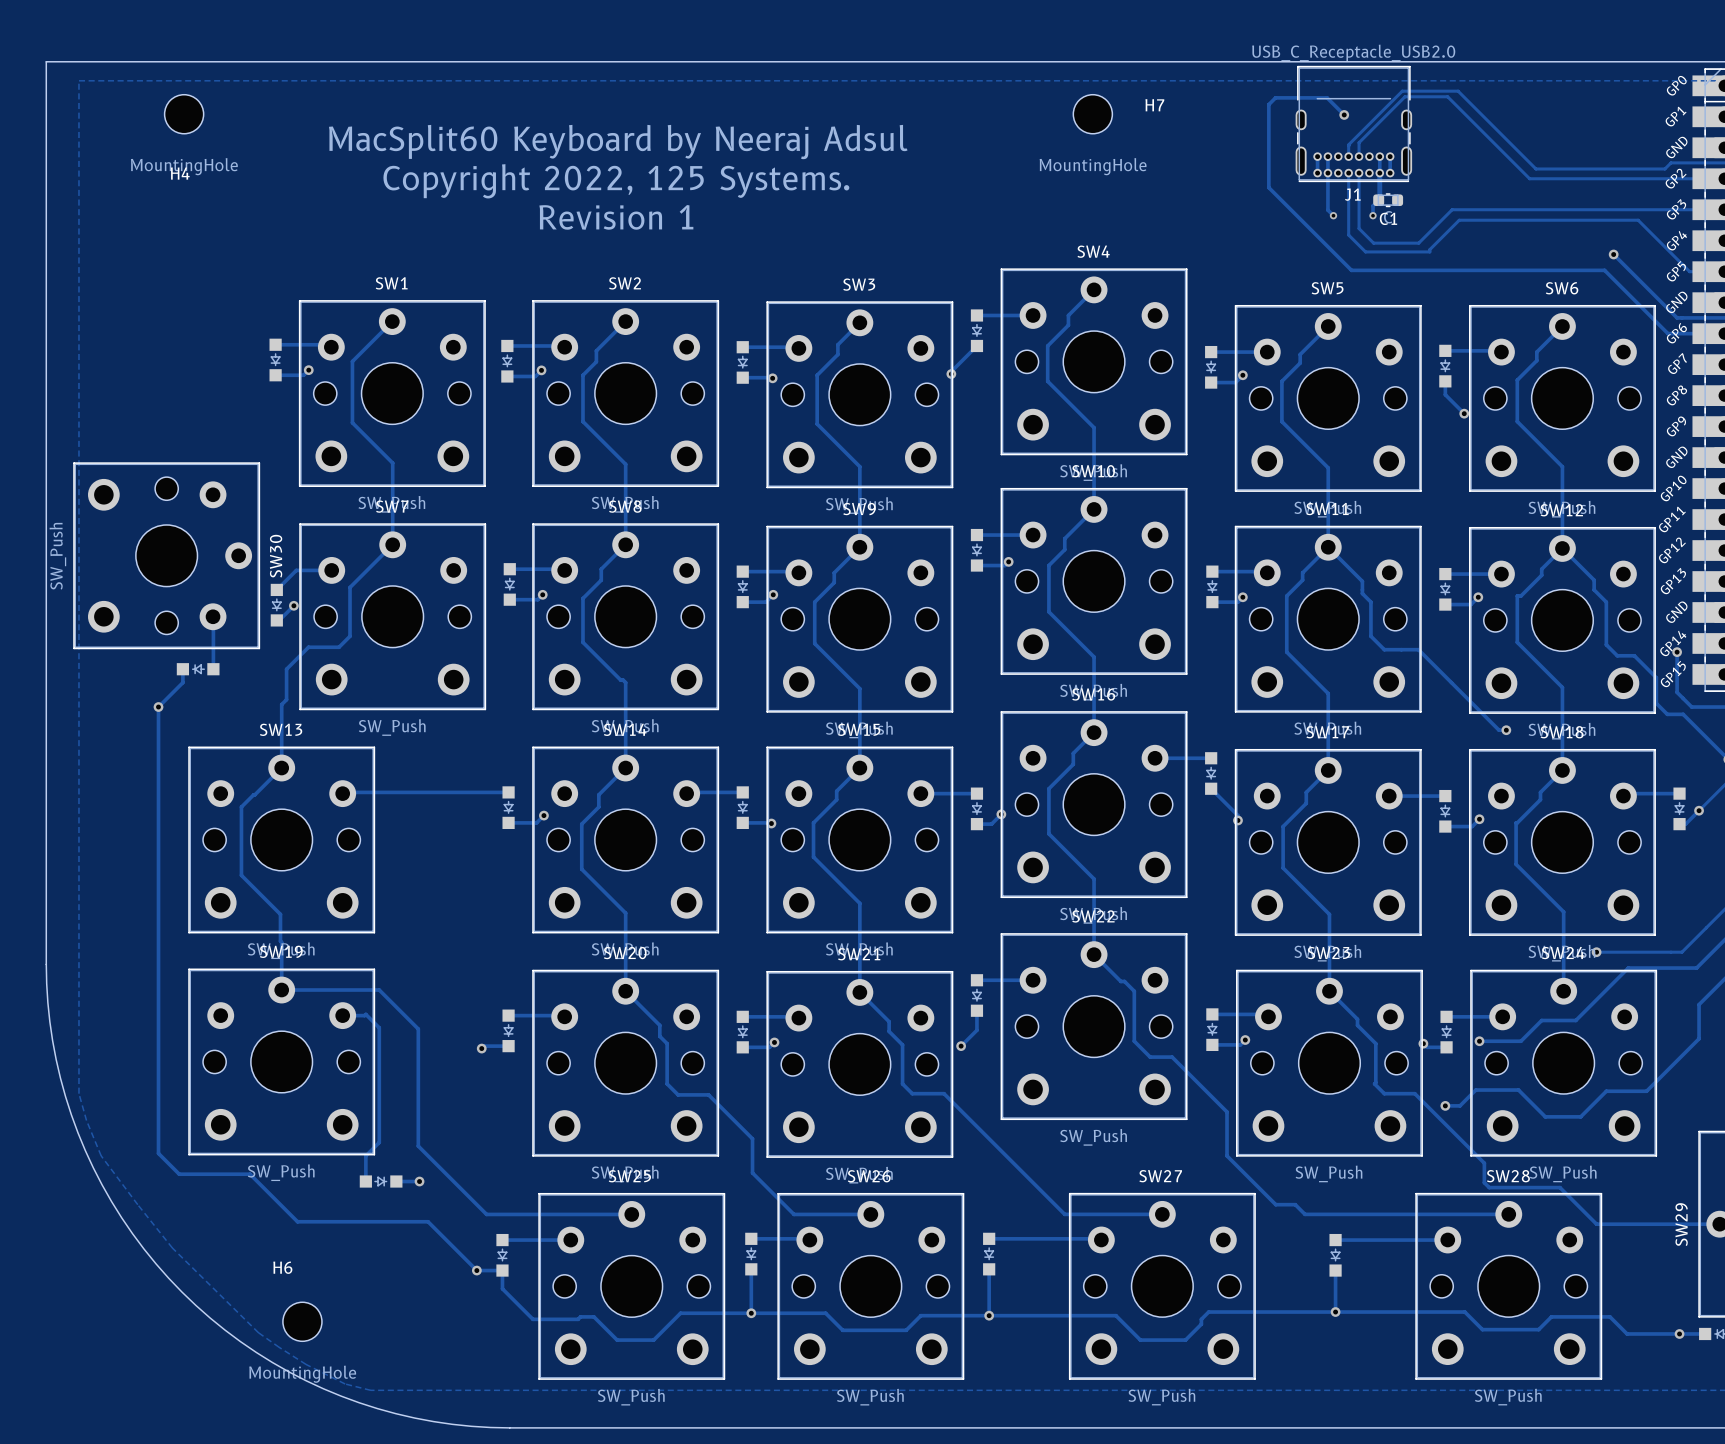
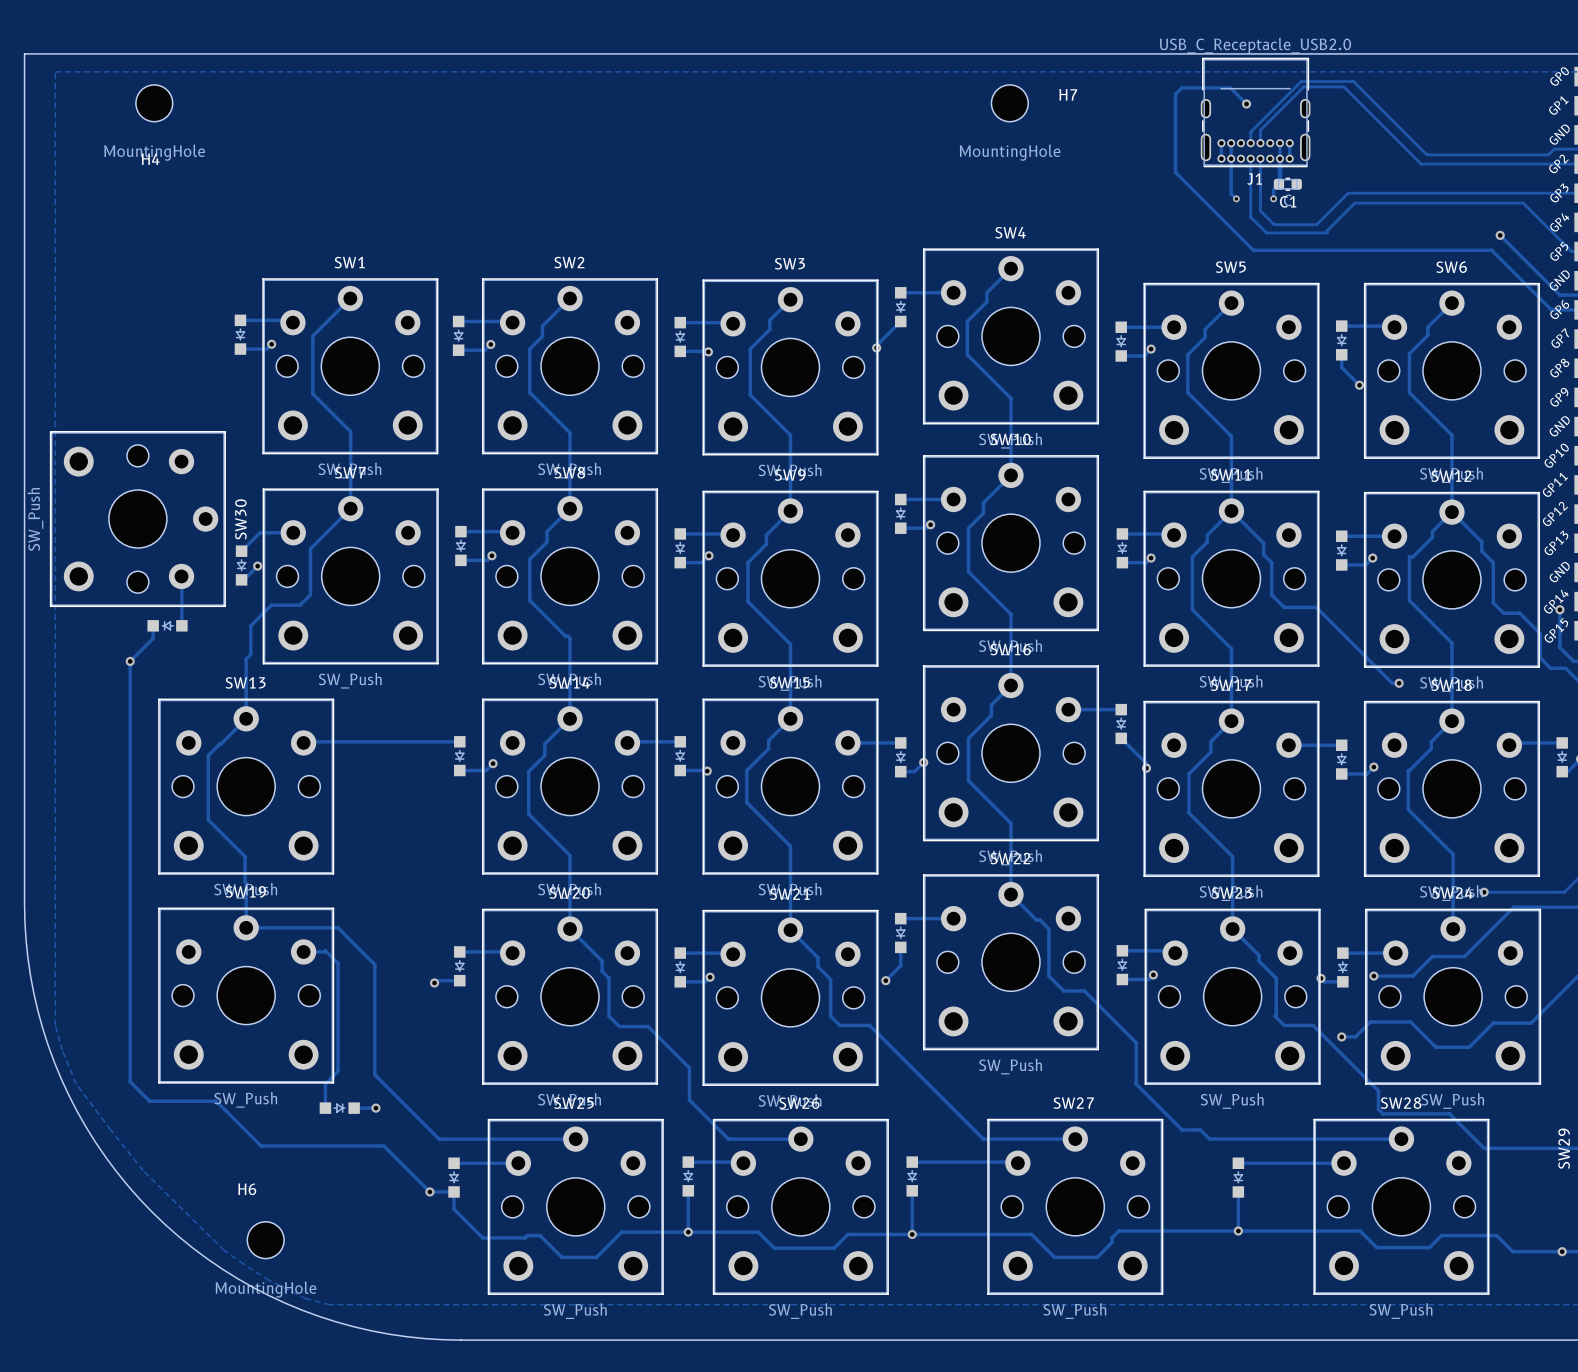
text: MacSplit60 Keyboard by Neeraj Adsul (618, 142) -> none
text: Copyright 2022, 125 Systems. (616, 181) -> none
text: Revision 1 (616, 217) -> none

